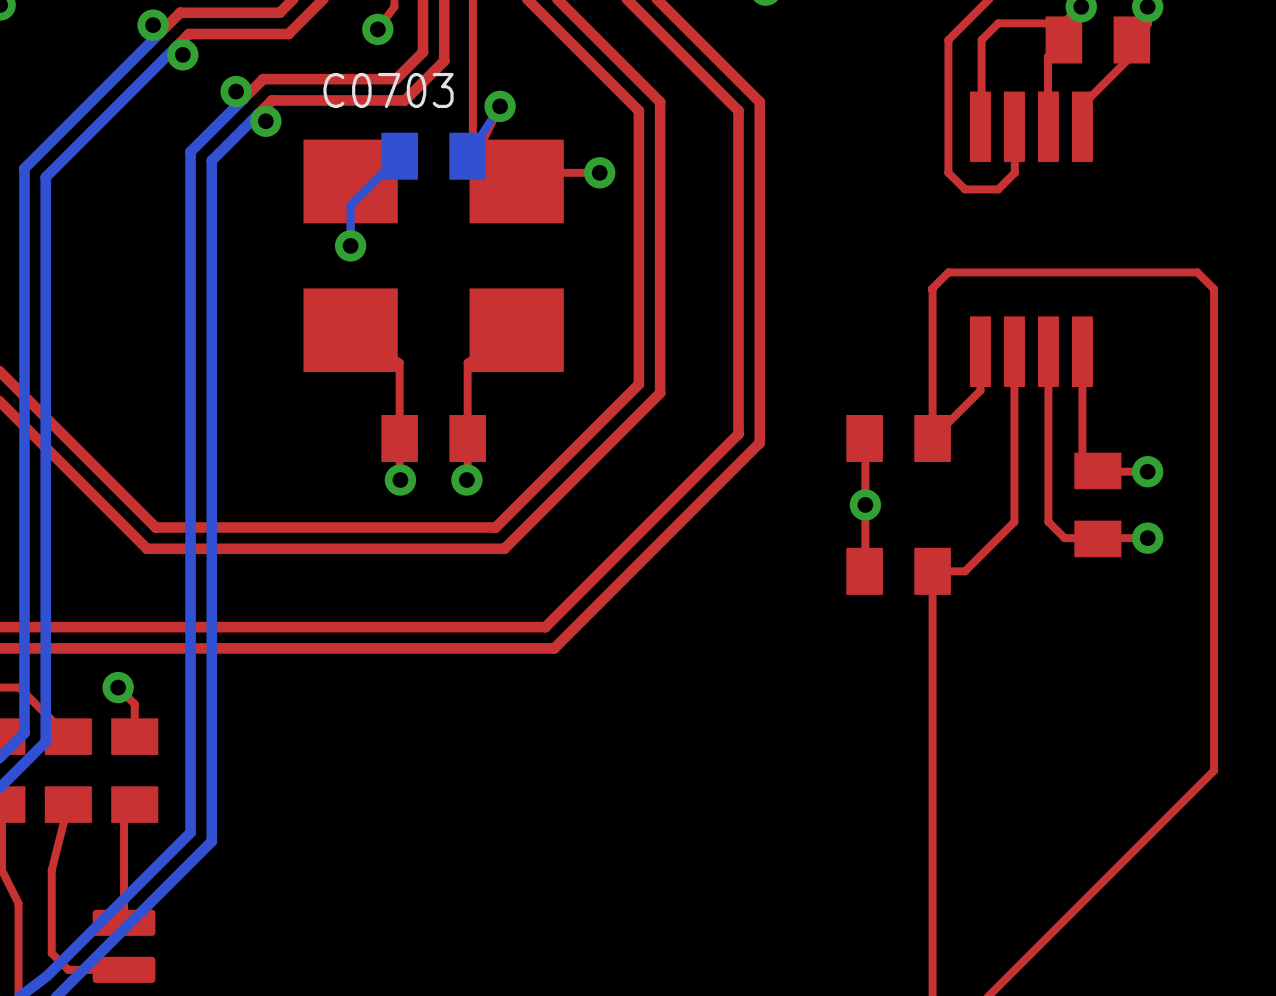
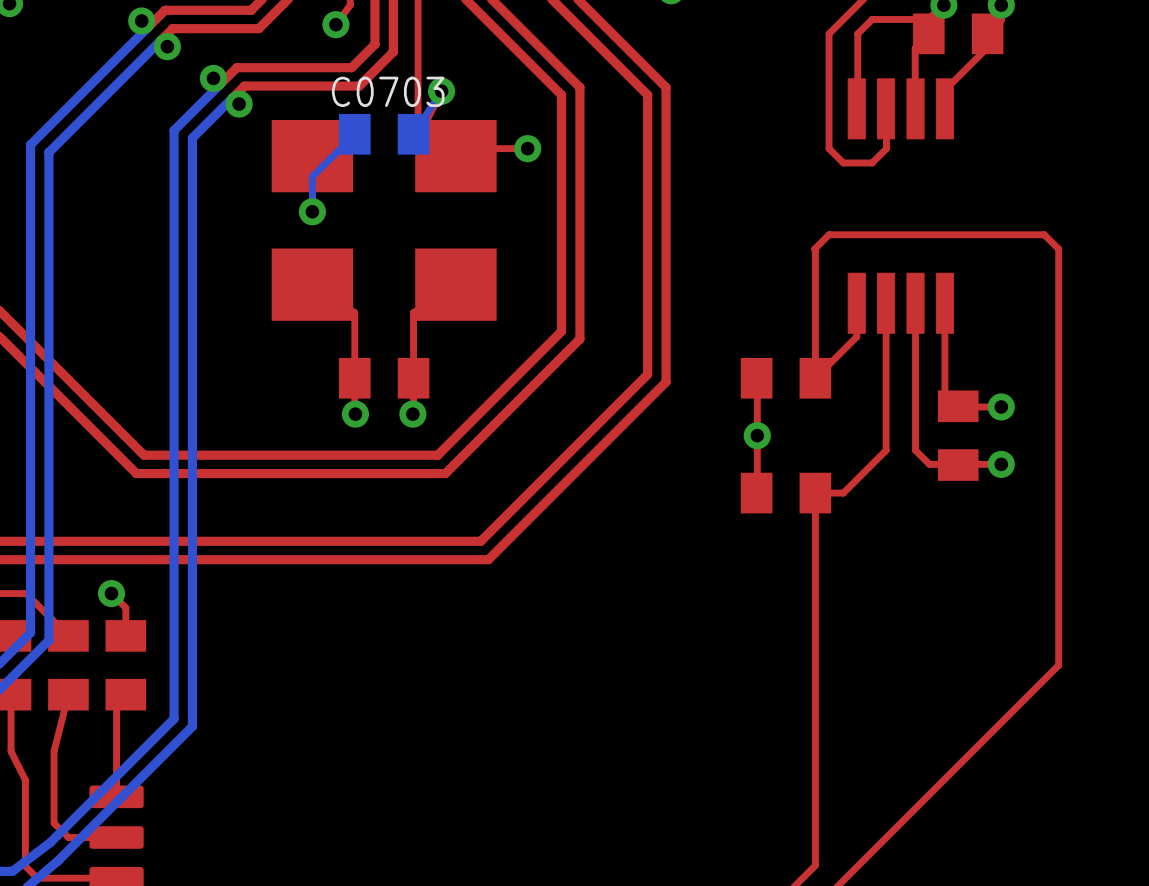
C0703 name position: C0703 (388, 90) -> C0703 (388, 91)

